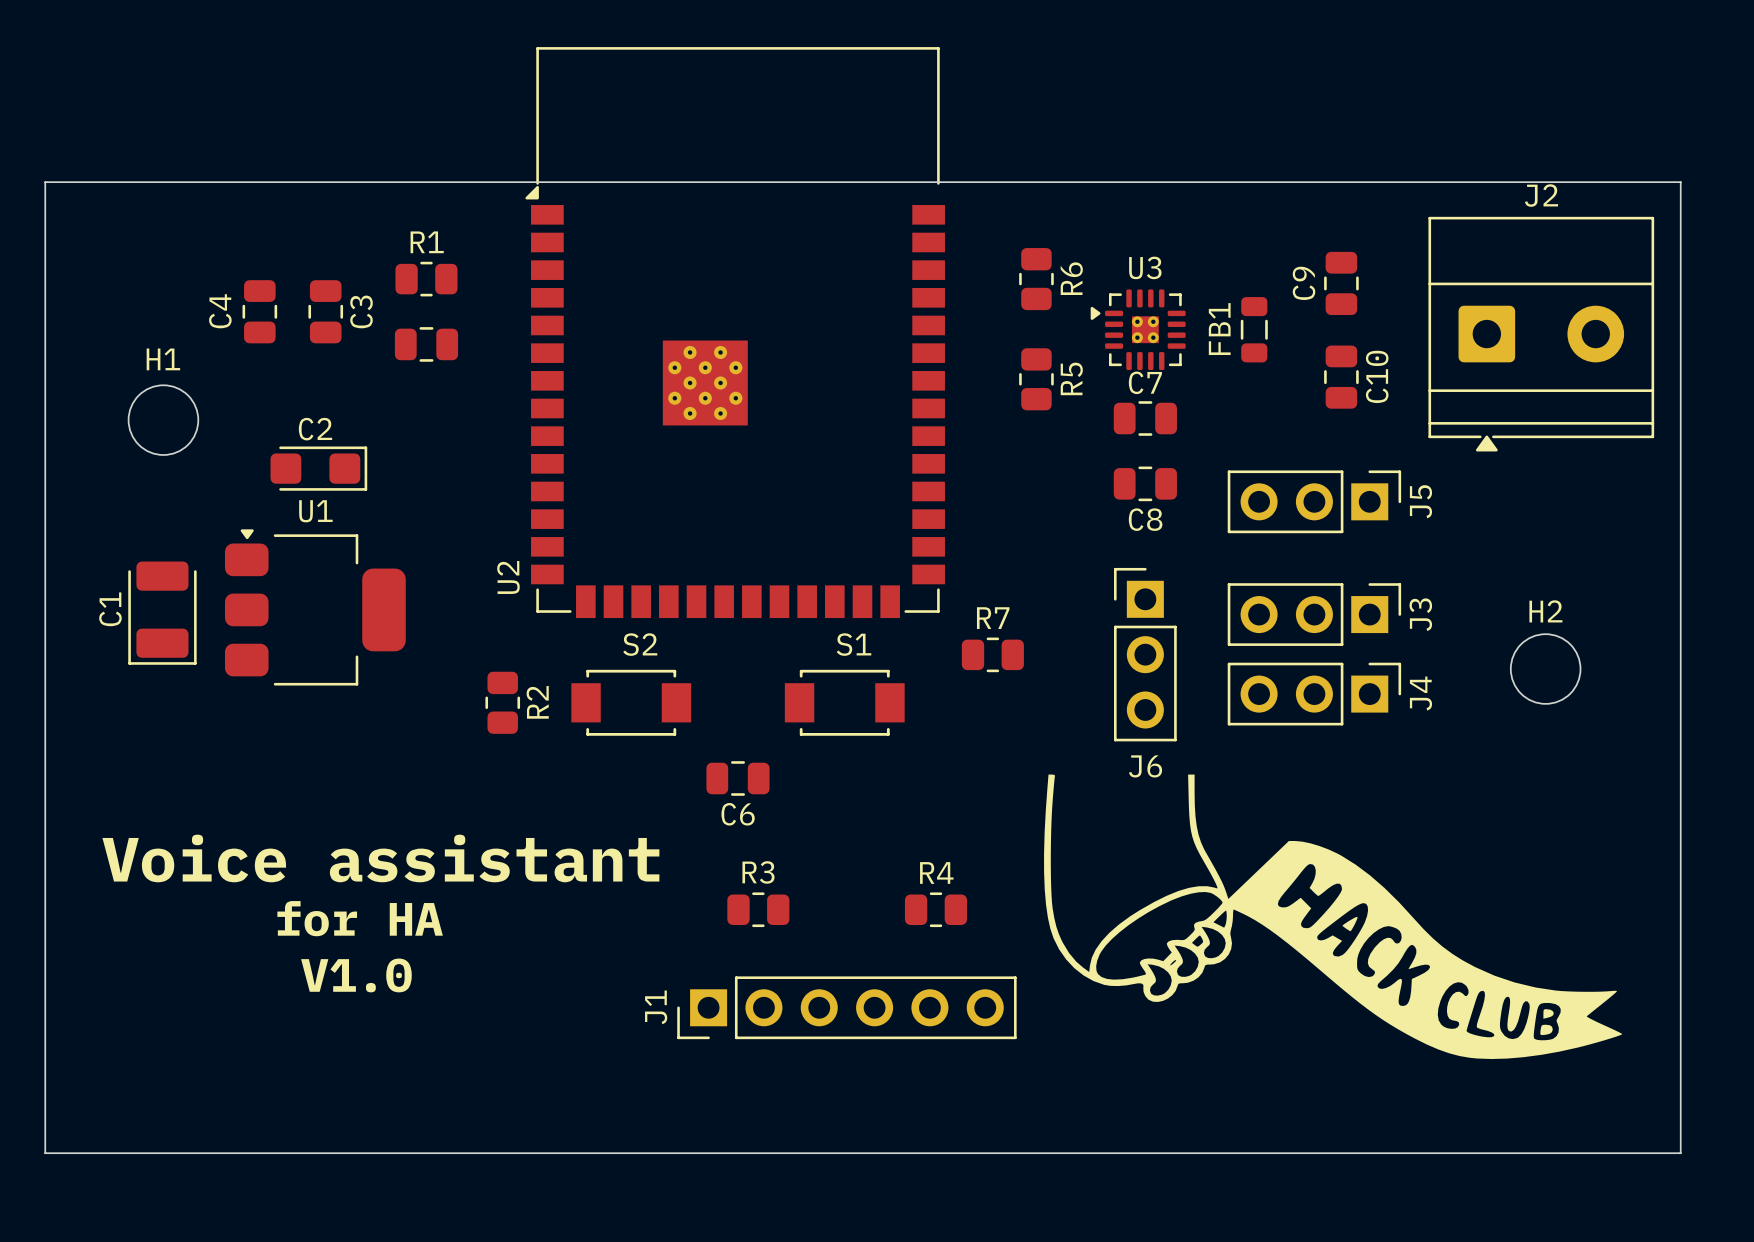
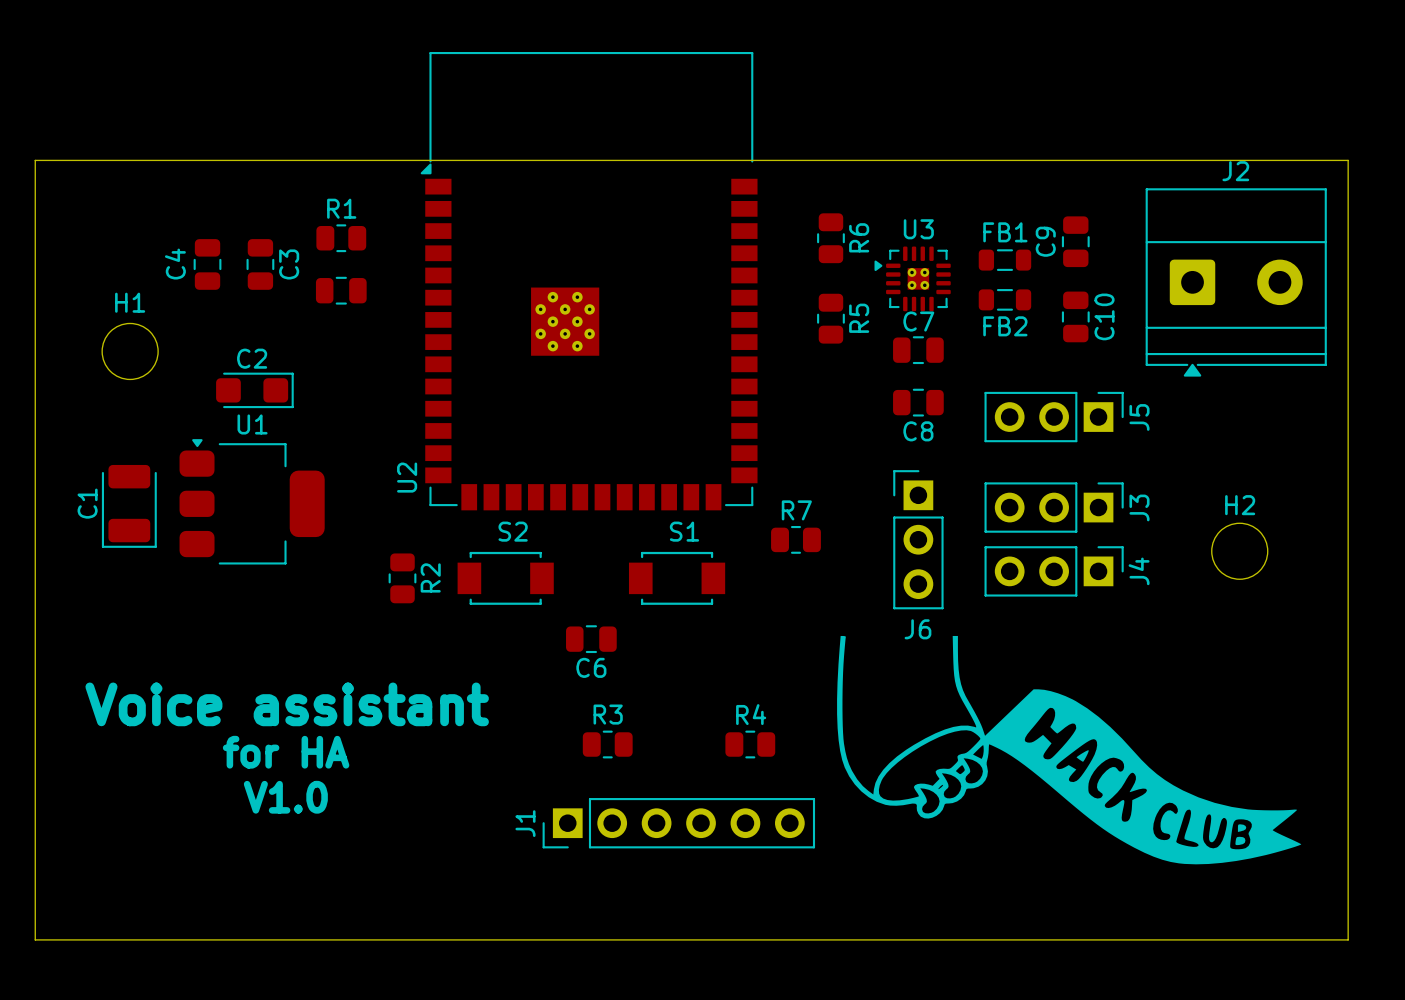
FB1 rotation: 0° (1254, 329) -> 90° clockwise (1004, 260)
FB2: none -> (1004, 299)

